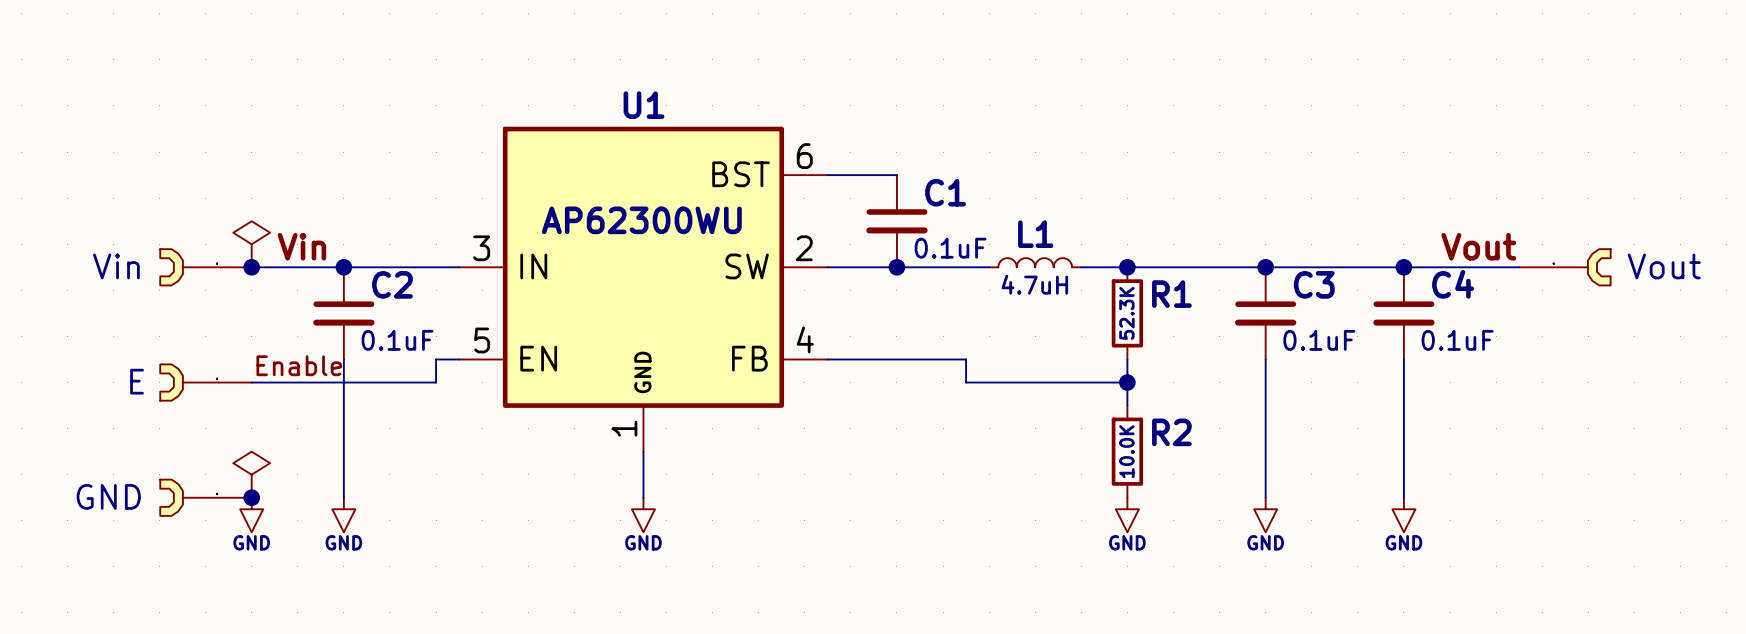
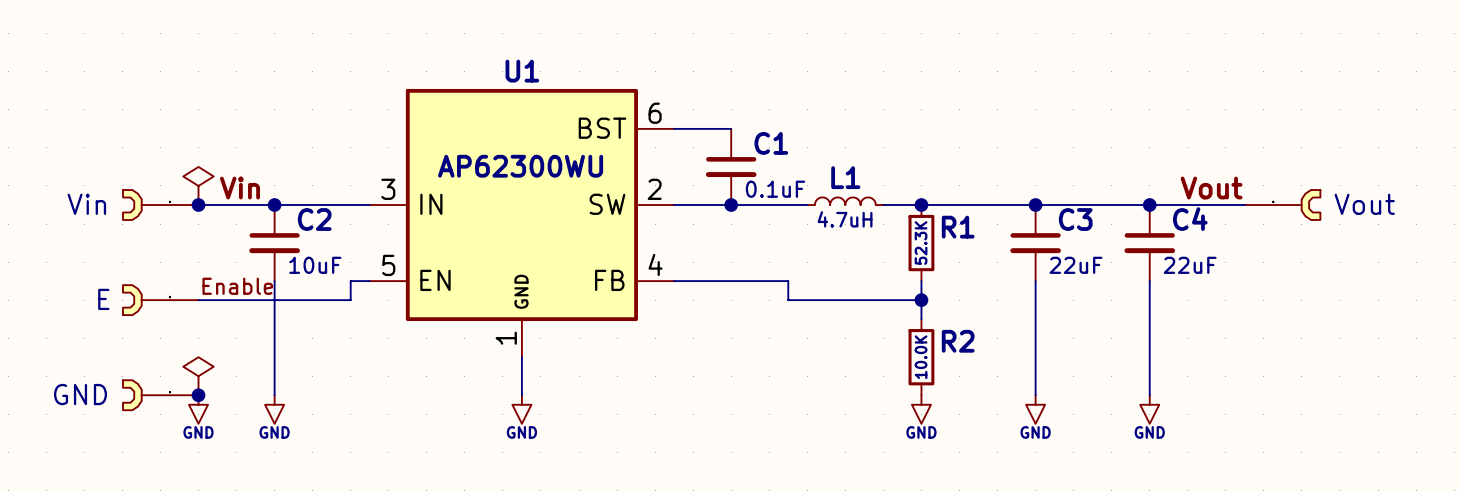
C2 value: 0.1uF (397, 340) -> 10uF (315, 265)
C3 value: 0.1uF (1319, 340) -> 22uF (1075, 265)
C4 value: 0.1uF (1457, 340) -> 22uF (1190, 265)

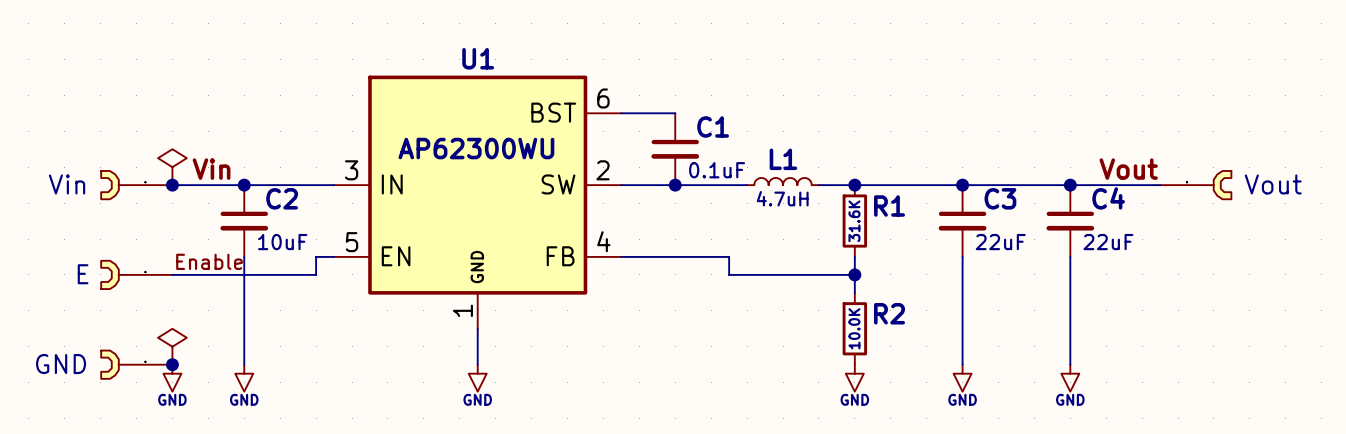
R1 value: 52.3K (921, 243) -> 31.6K (854, 221)

